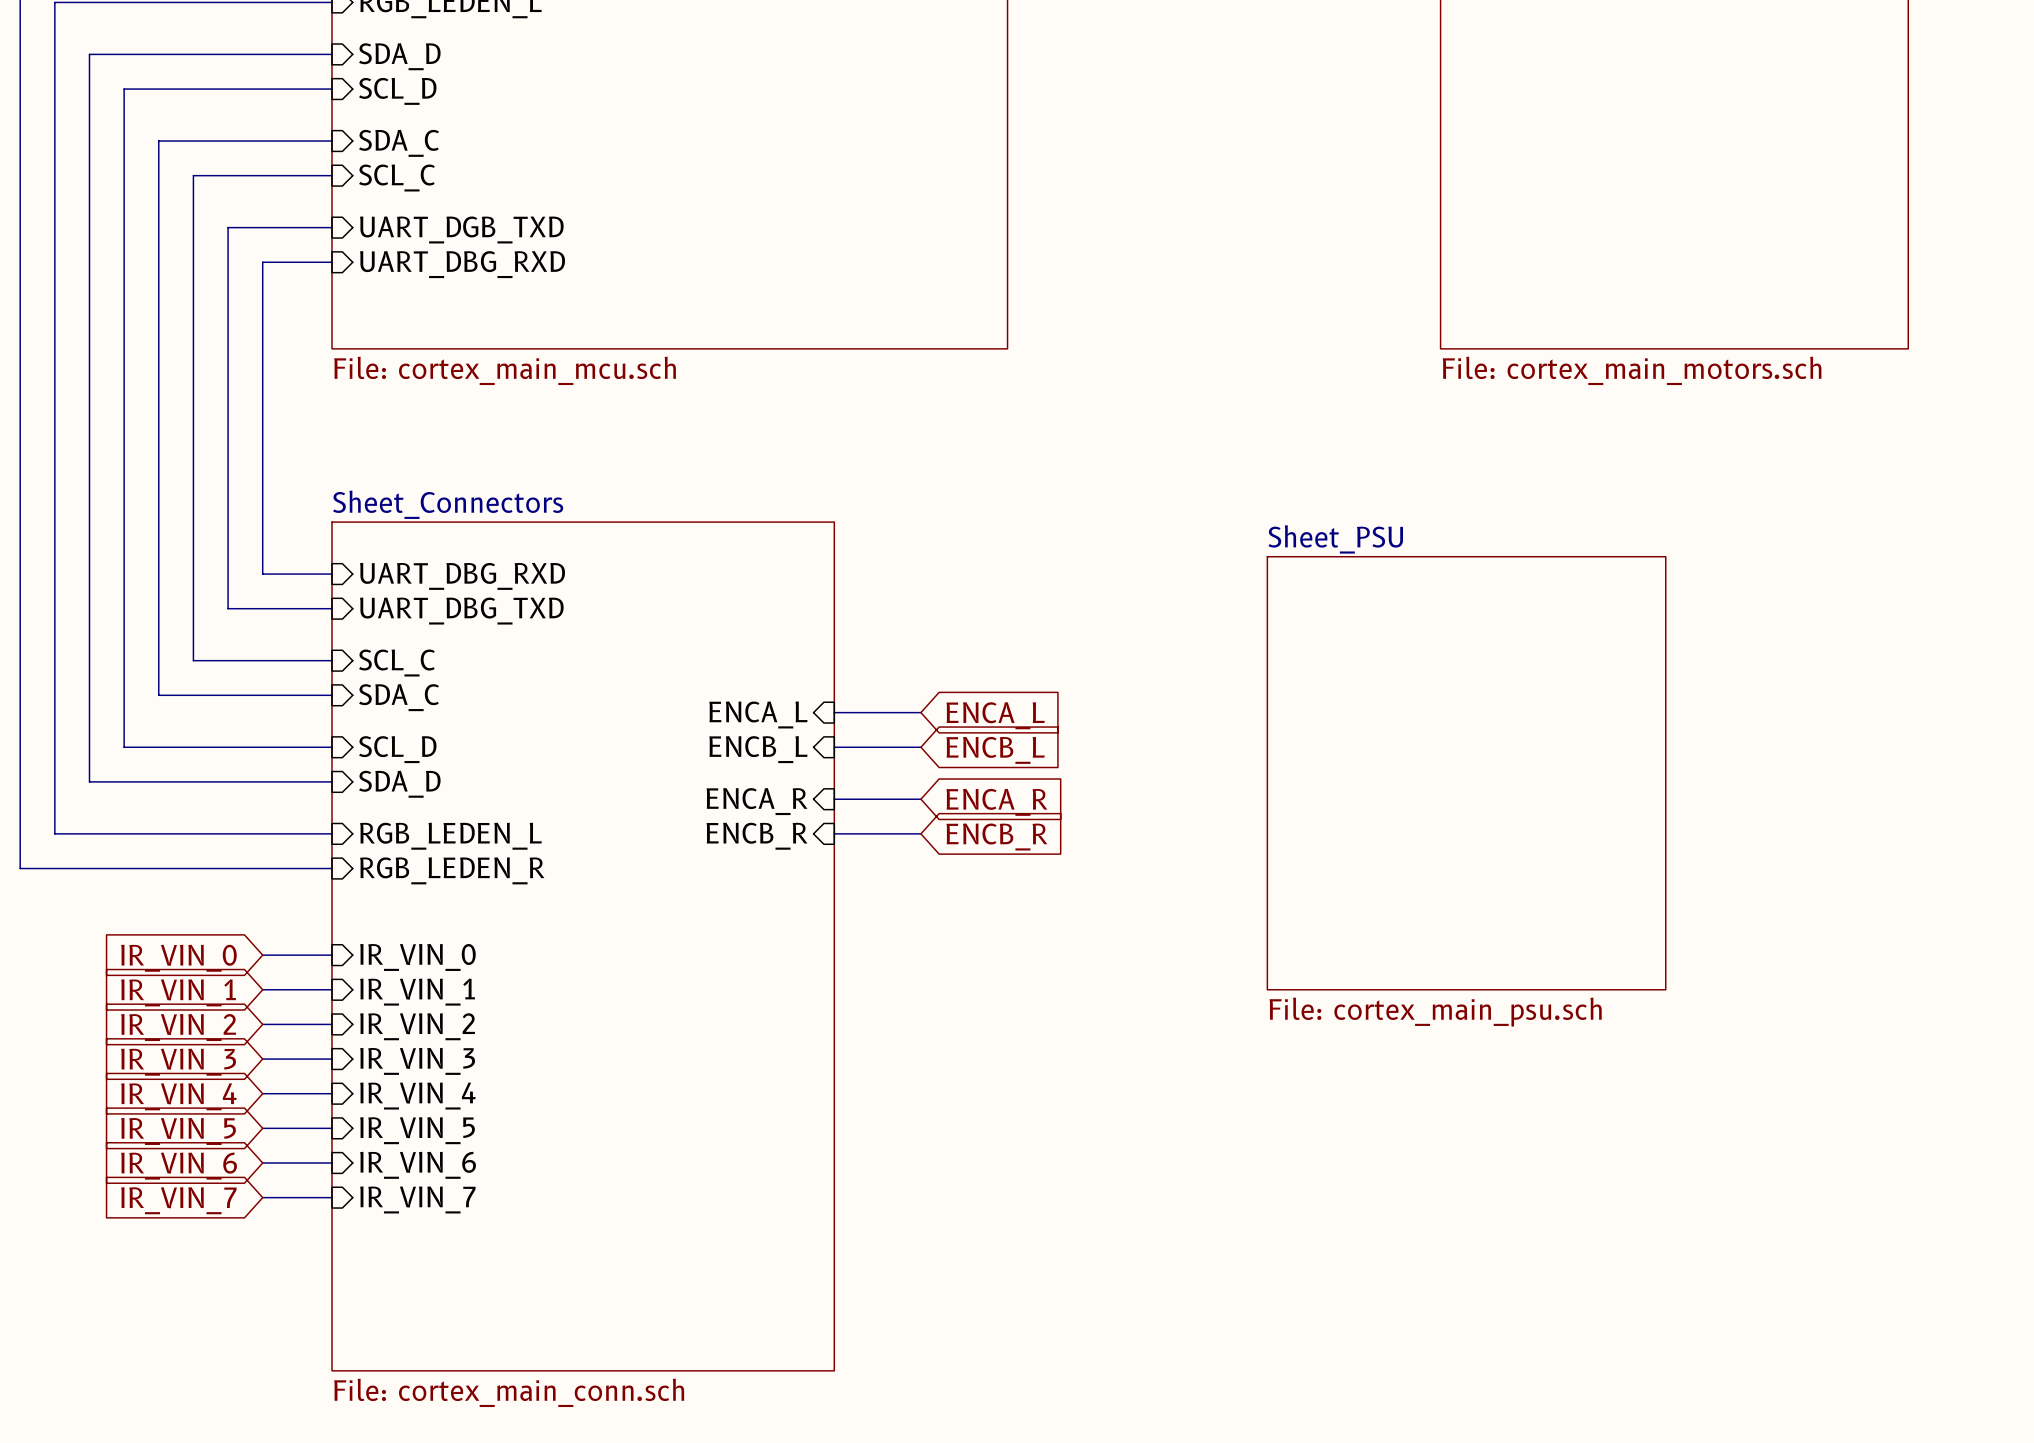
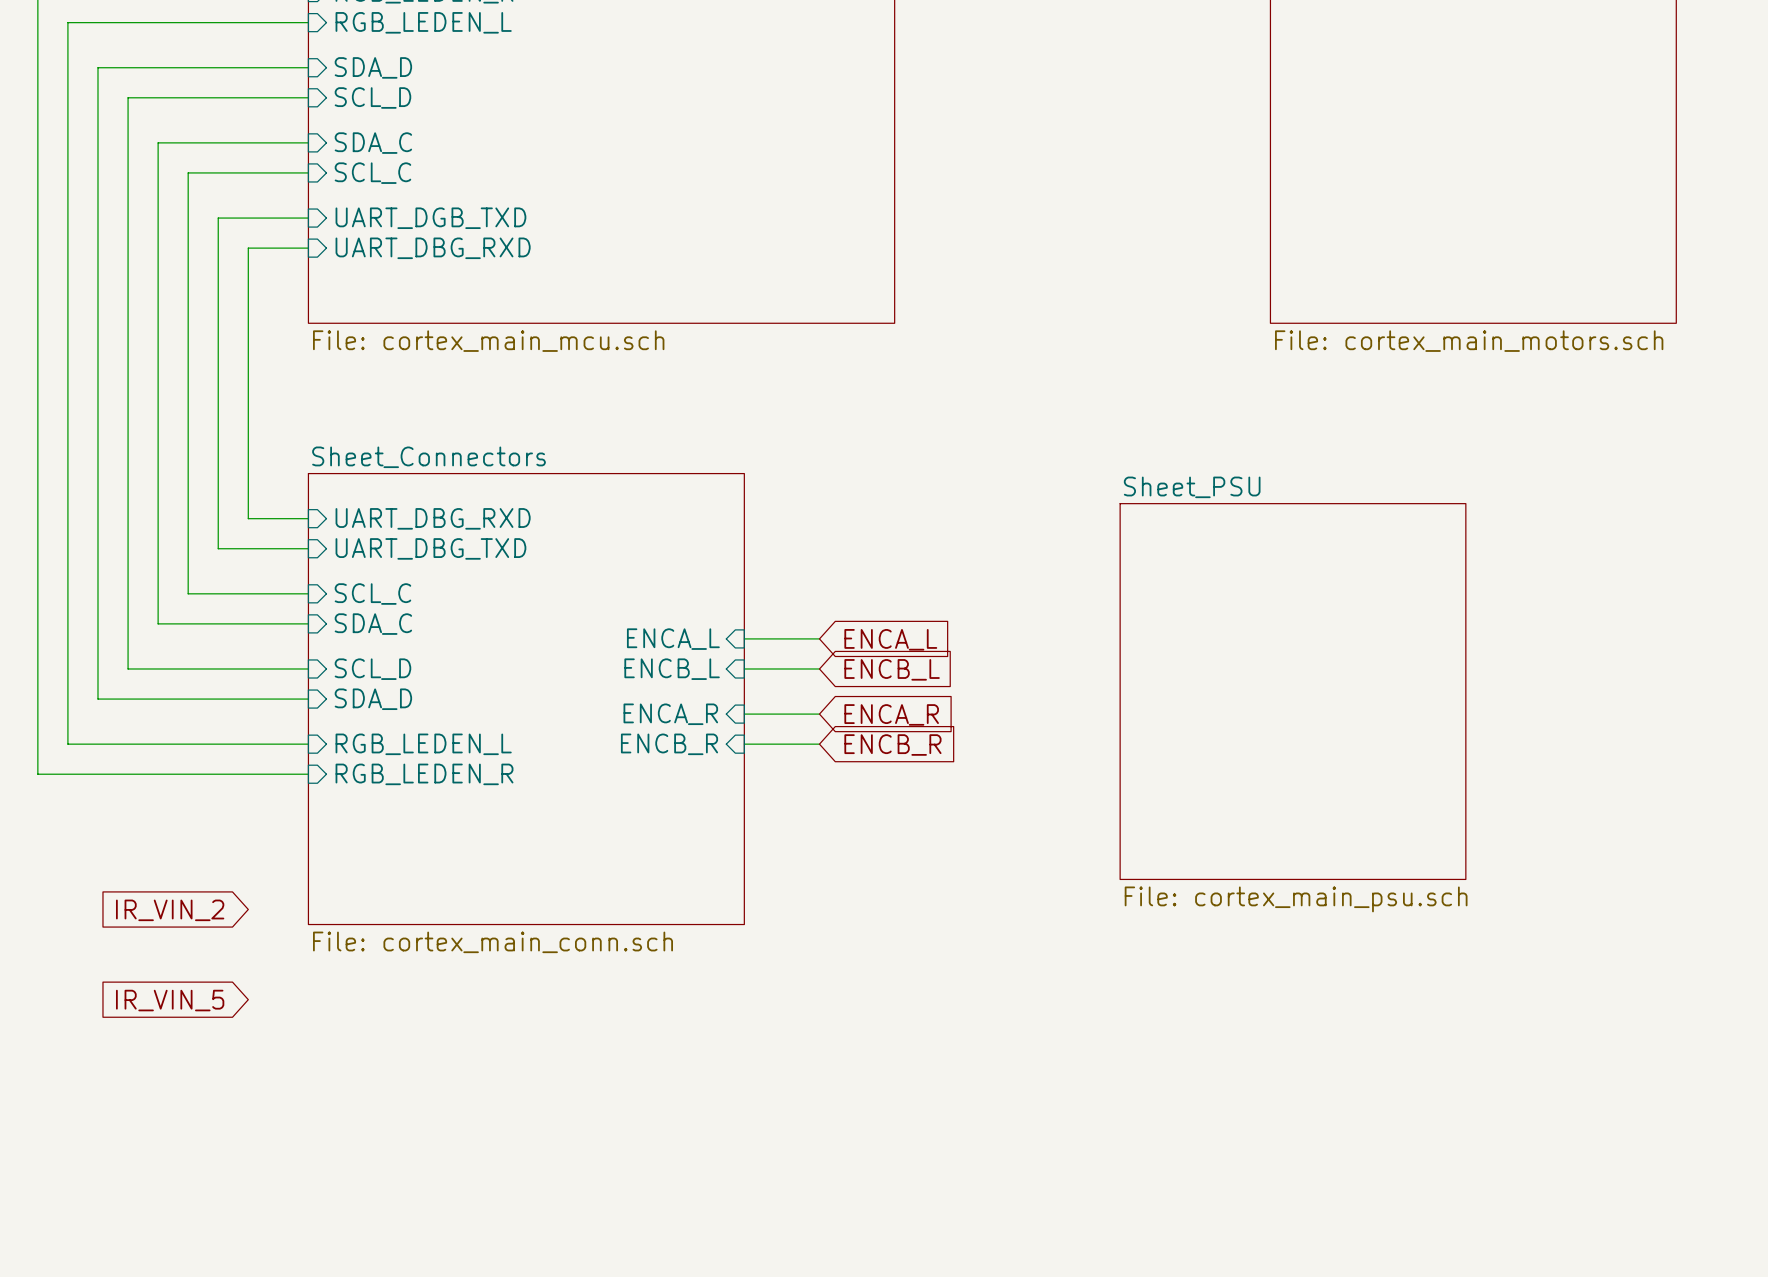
sheet Sheet_Connectors: none -> File: cortex_main_conn.sch (526, 699)
sheet Sheet_Connectors: File: cortex_main_conn.sch (583, 946) -> none
wire: (262, 955) (331, 955) -> none
sheet pin: IR_VIN_0 (417, 957) -> none
global label: IR_VIN_0 (178, 958) -> none
wire: (262, 989) (331, 989) -> none
global label: IR_VIN_1 (178, 992) -> none
sheet pin: IR_VIN_1 (417, 992) -> none
wire: (262, 1024) (331, 1024) -> none
sheet pin: IR_VIN_2 (417, 1026) -> none
wire: (262, 1059) (331, 1059) -> none
sheet pin: IR_VIN_3 (417, 1061) -> none
global label: IR_VIN_3 (178, 1062) -> none
wire: (262, 1093) (331, 1093) -> none
global label: IR_VIN_4 (178, 1096) -> none
sheet pin: IR_VIN_4 (417, 1096) -> none
wire: (262, 1128) (331, 1128) -> none
sheet pin: IR_VIN_5 (417, 1130) -> none
wire: (262, 1162) (331, 1162) -> none
sheet pin: IR_VIN_6 (418, 1165) -> none
global label: IR_VIN_6 (179, 1166) -> none
wire: (262, 1197) (331, 1197) -> none
sheet pin: IR_VIN_7 (417, 1199) -> none
global label: IR_VIN_7 (178, 1200) -> none

